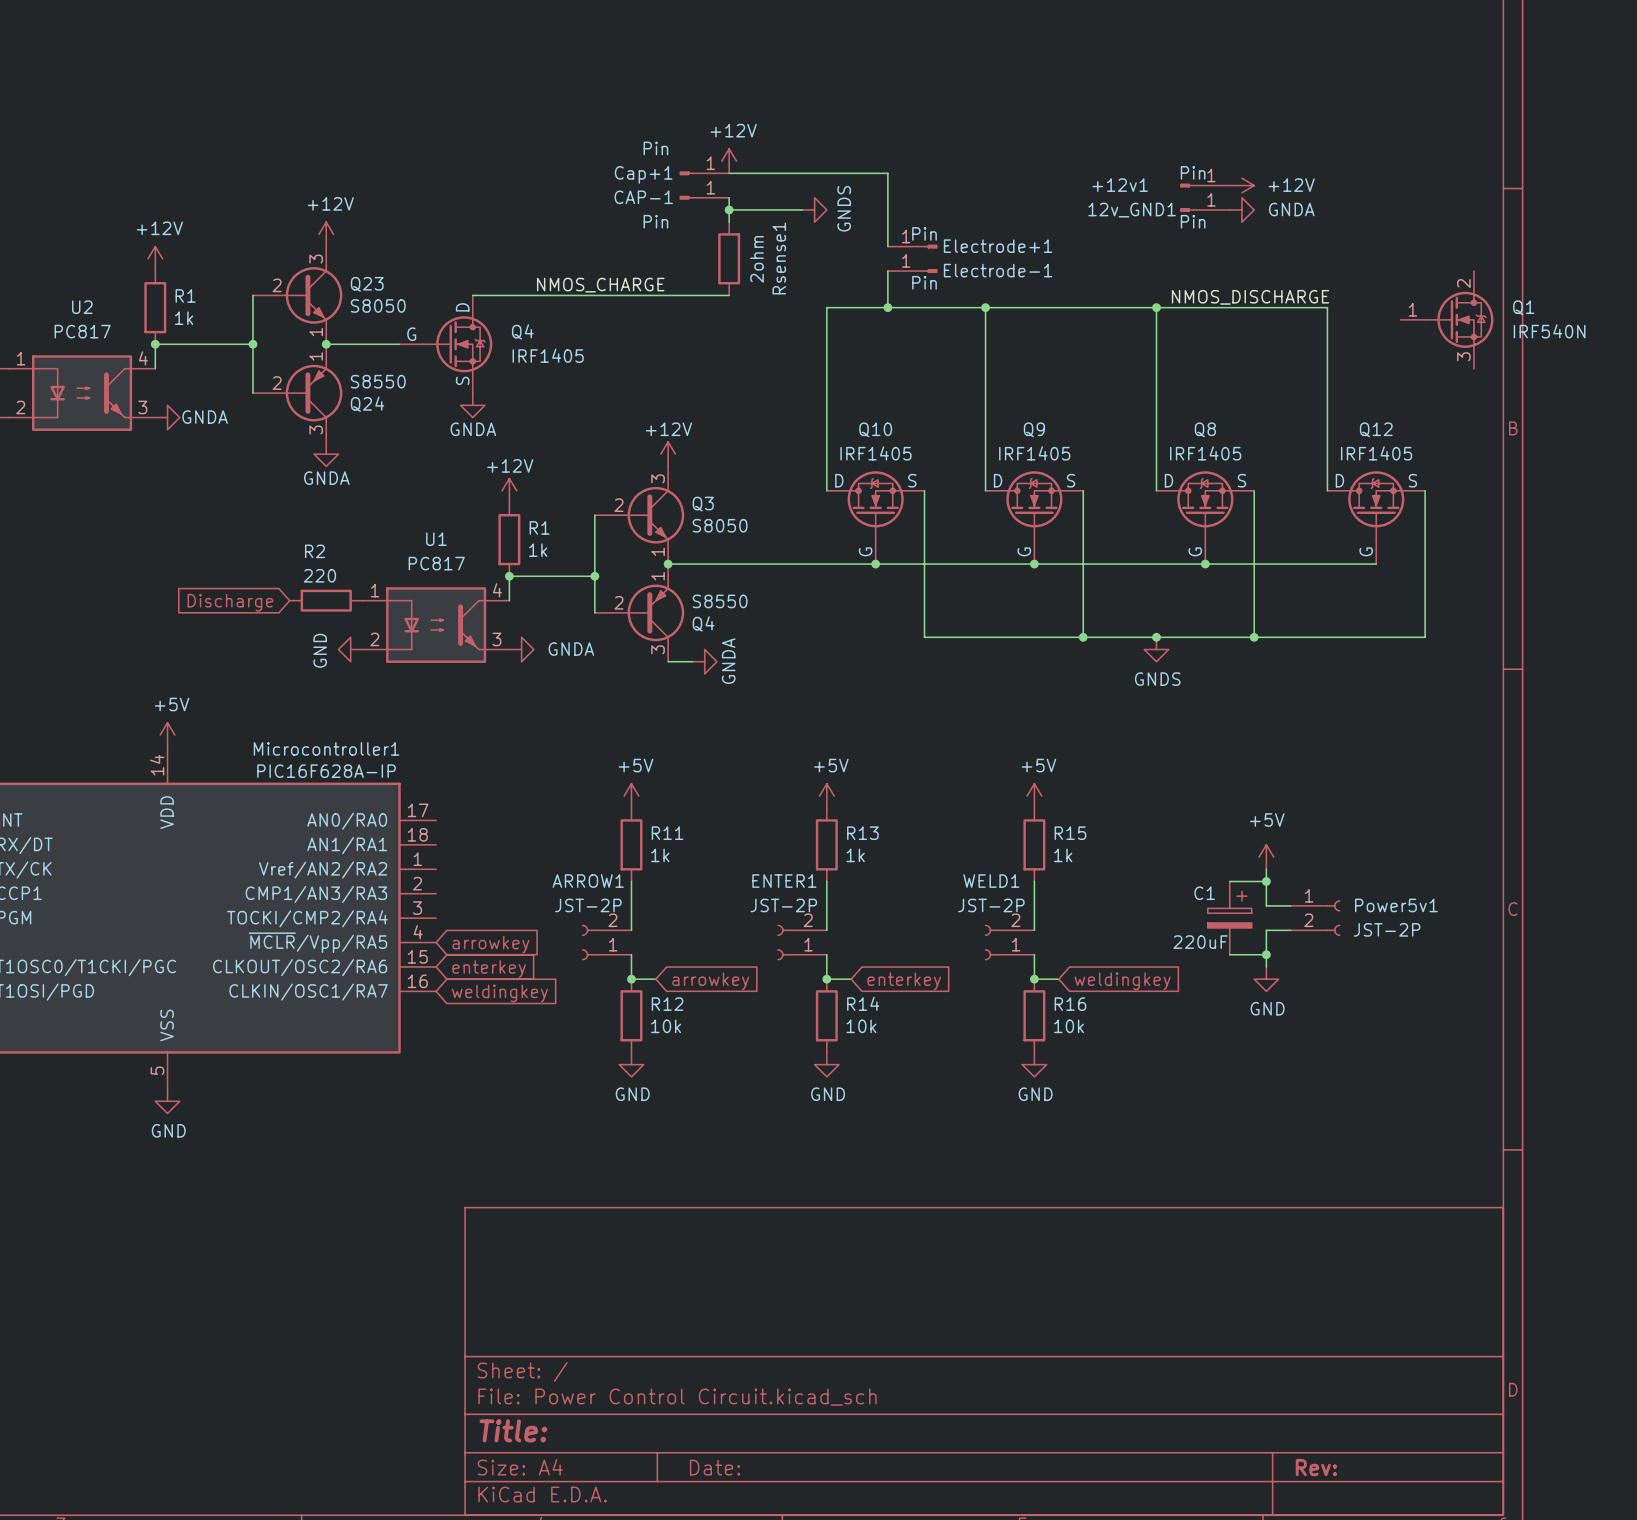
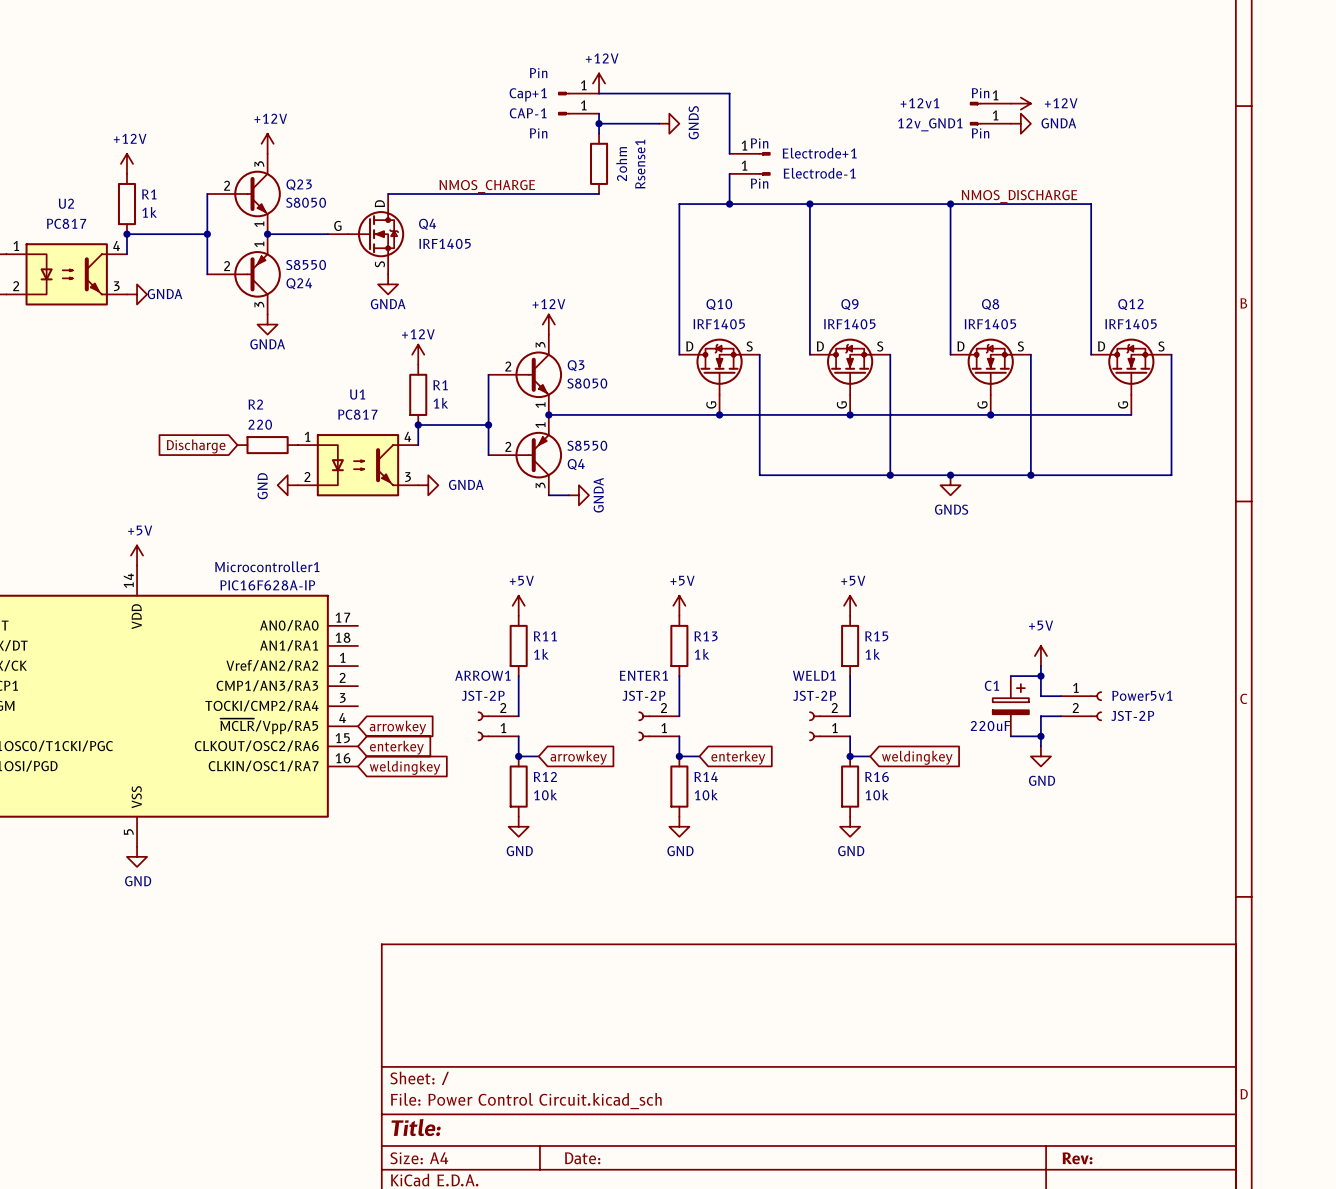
Q1: IRF540N (1447, 319) -> none

